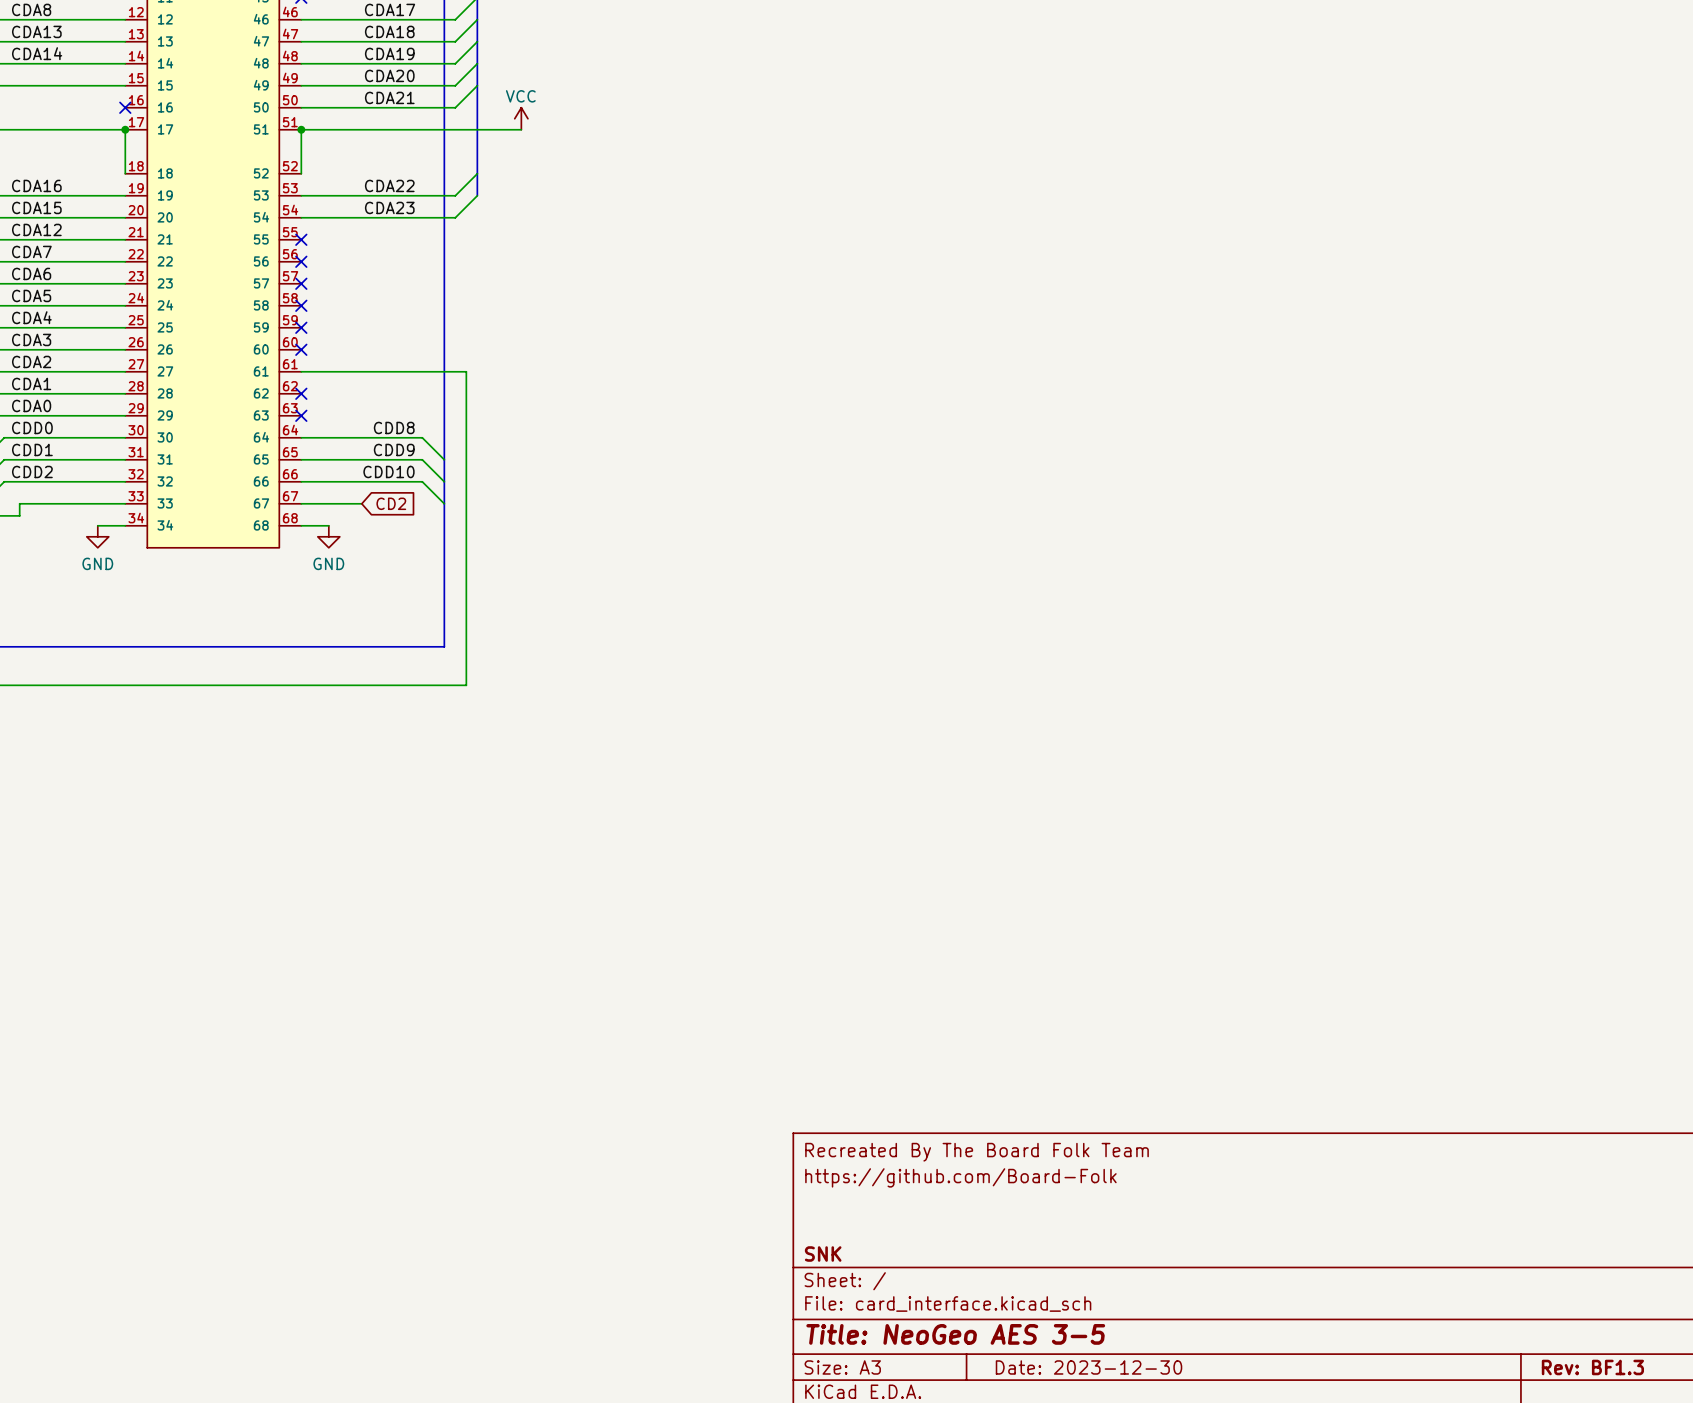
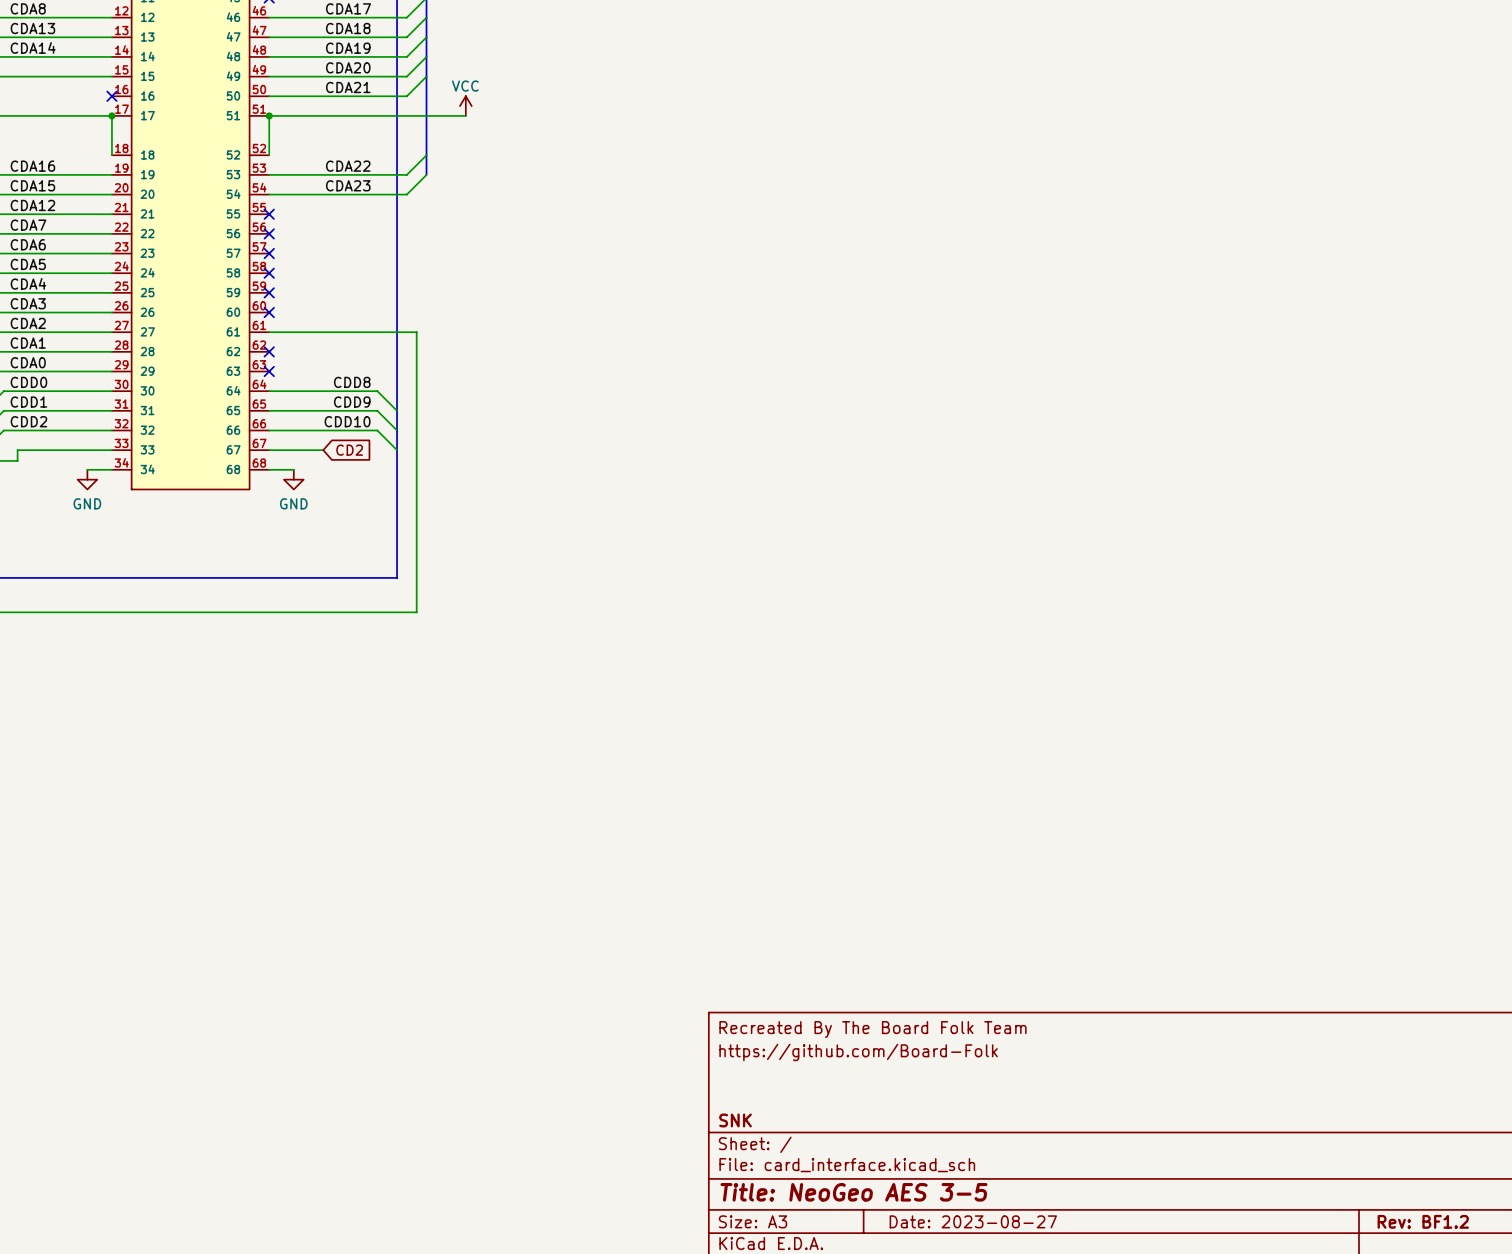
title block: Date: 2023-12-30 (1089, 1367) -> Date: 2023-08-27 (973, 1221)
title block: Rev: BF1.3 (1592, 1367) -> Rev: BF1.2 (1423, 1221)

